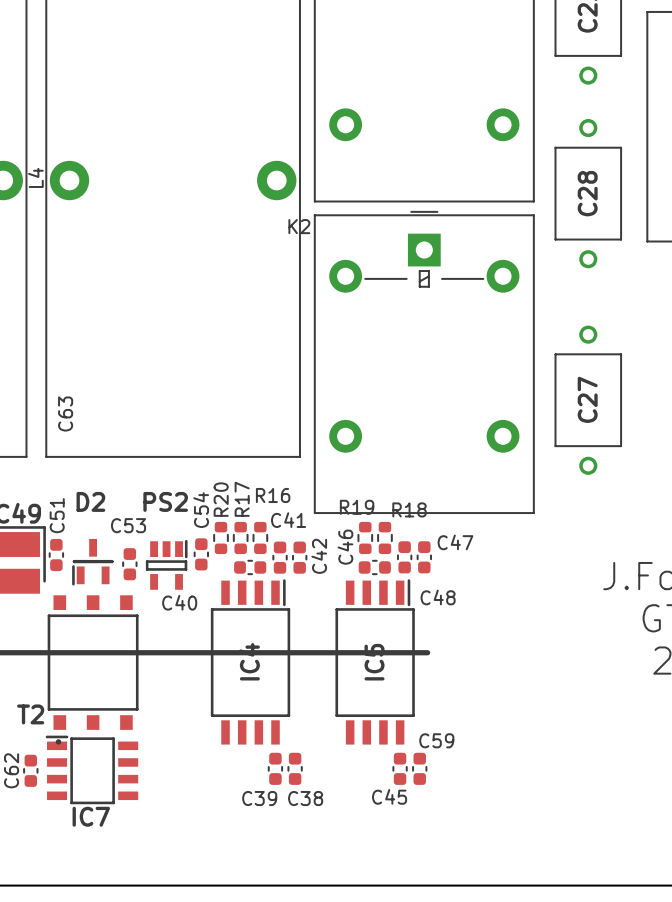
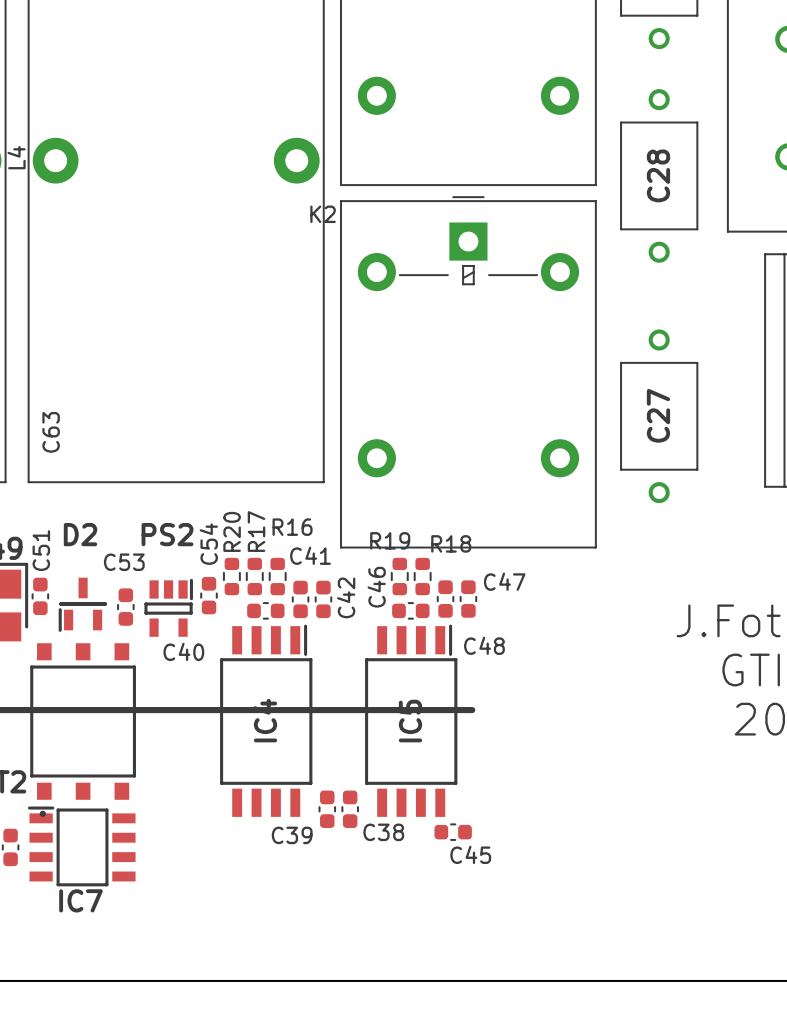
C39 position: (275, 768) -> (327, 809)
C38 position: (295, 768) -> (350, 809)
C45 rotation: 0° (400, 768) -> 90° clockwise (453, 832)
C59: (419, 768) -> none
C45 name position: C45 (389, 796) -> C45 (470, 854)
C39 name position: C39 (259, 798) -> C39 (292, 835)
C38 name position: C38 (305, 798) -> C38 (383, 832)

